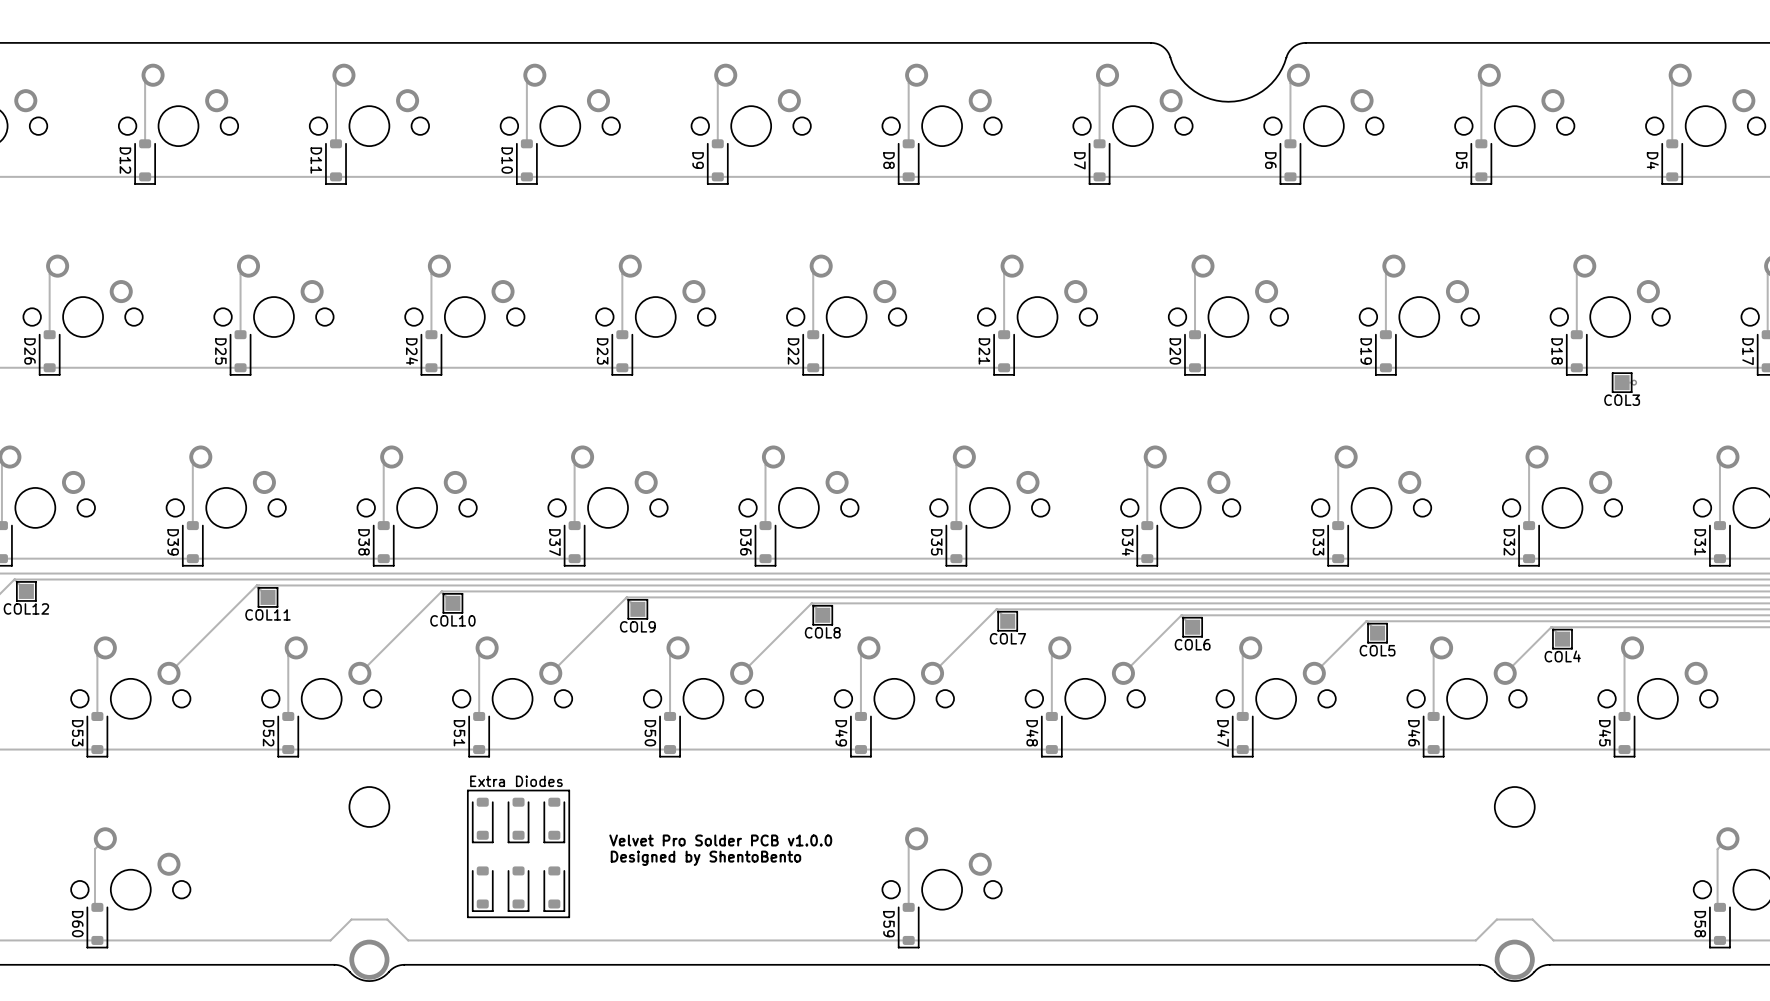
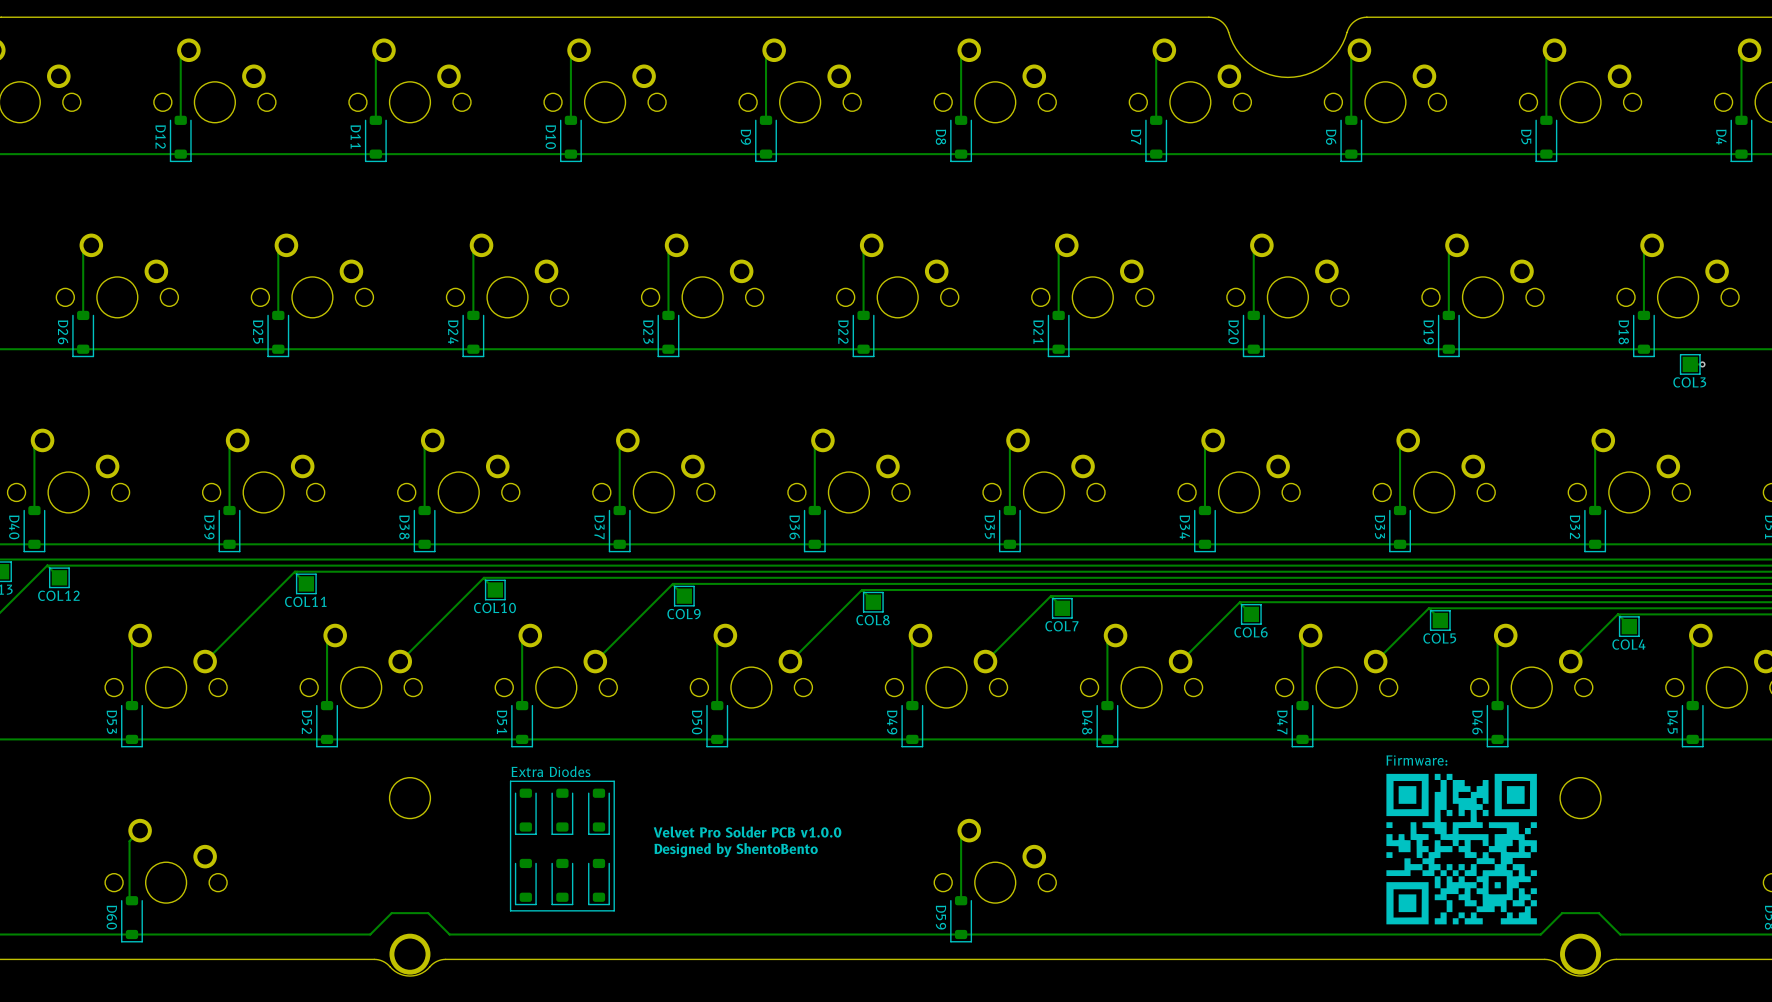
text: none -> Firmware: (1416, 760)
drawing: none -> [1386, 773, 1537, 925]

